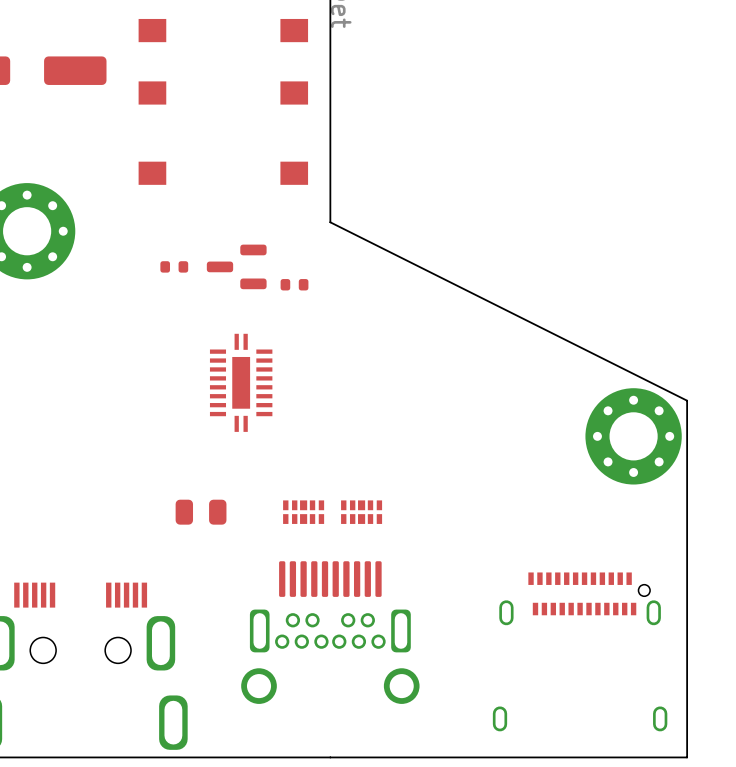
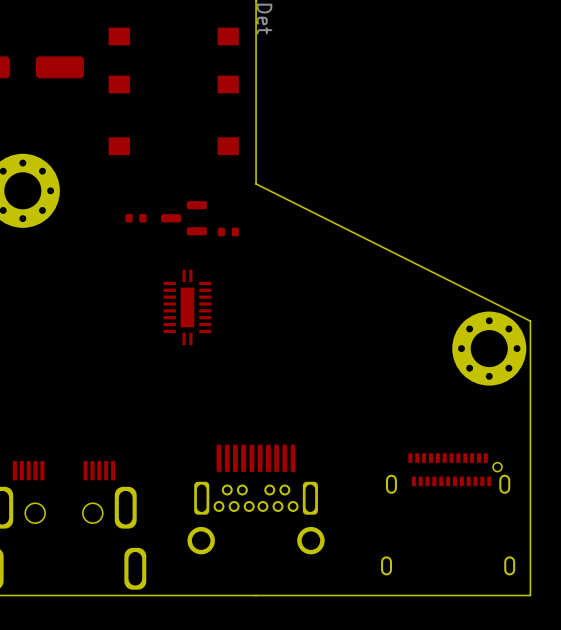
part: (201, 512) -> none
part: (303, 512) -> none
part: (361, 512) -> none

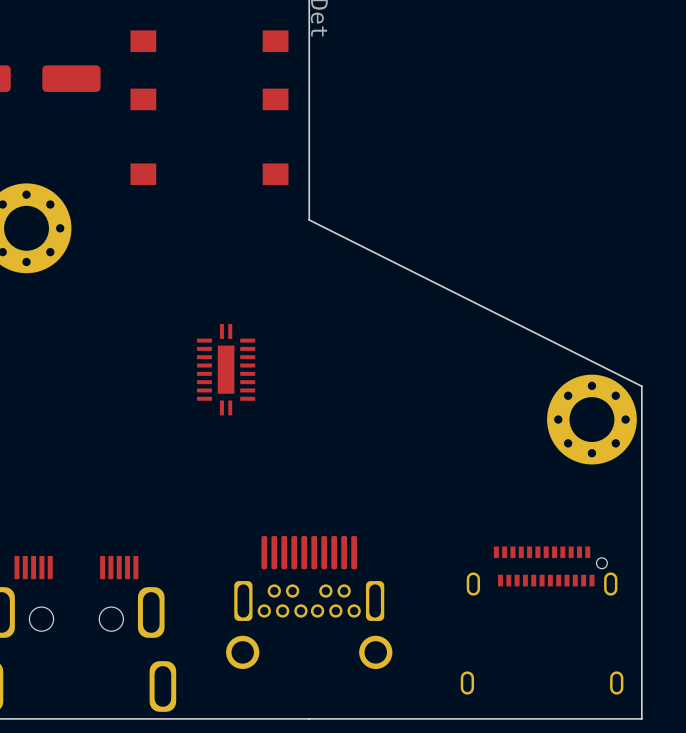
part: (136, 218) -> none
part: (184, 218) -> none
part: (228, 231) -> none

